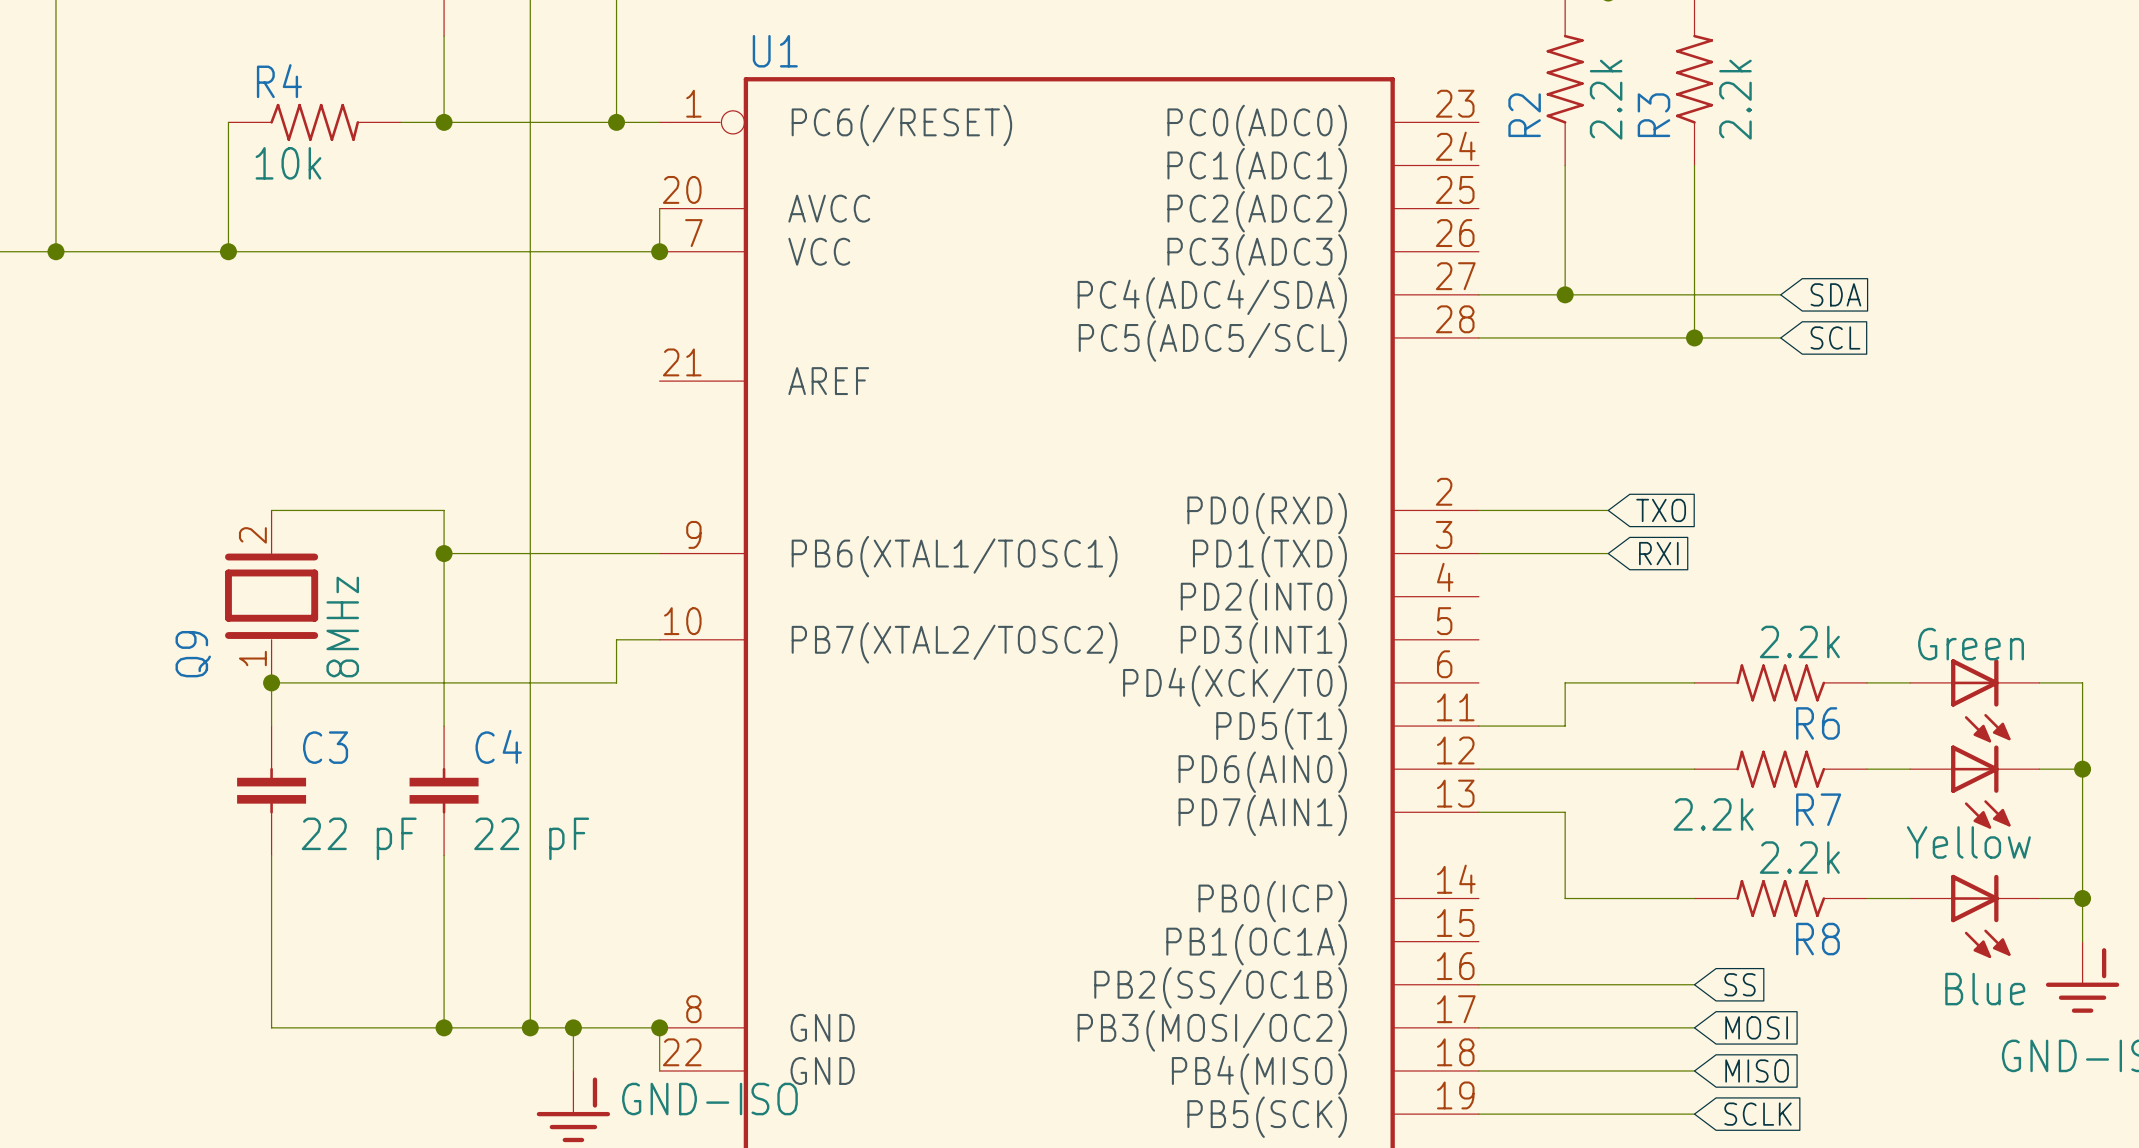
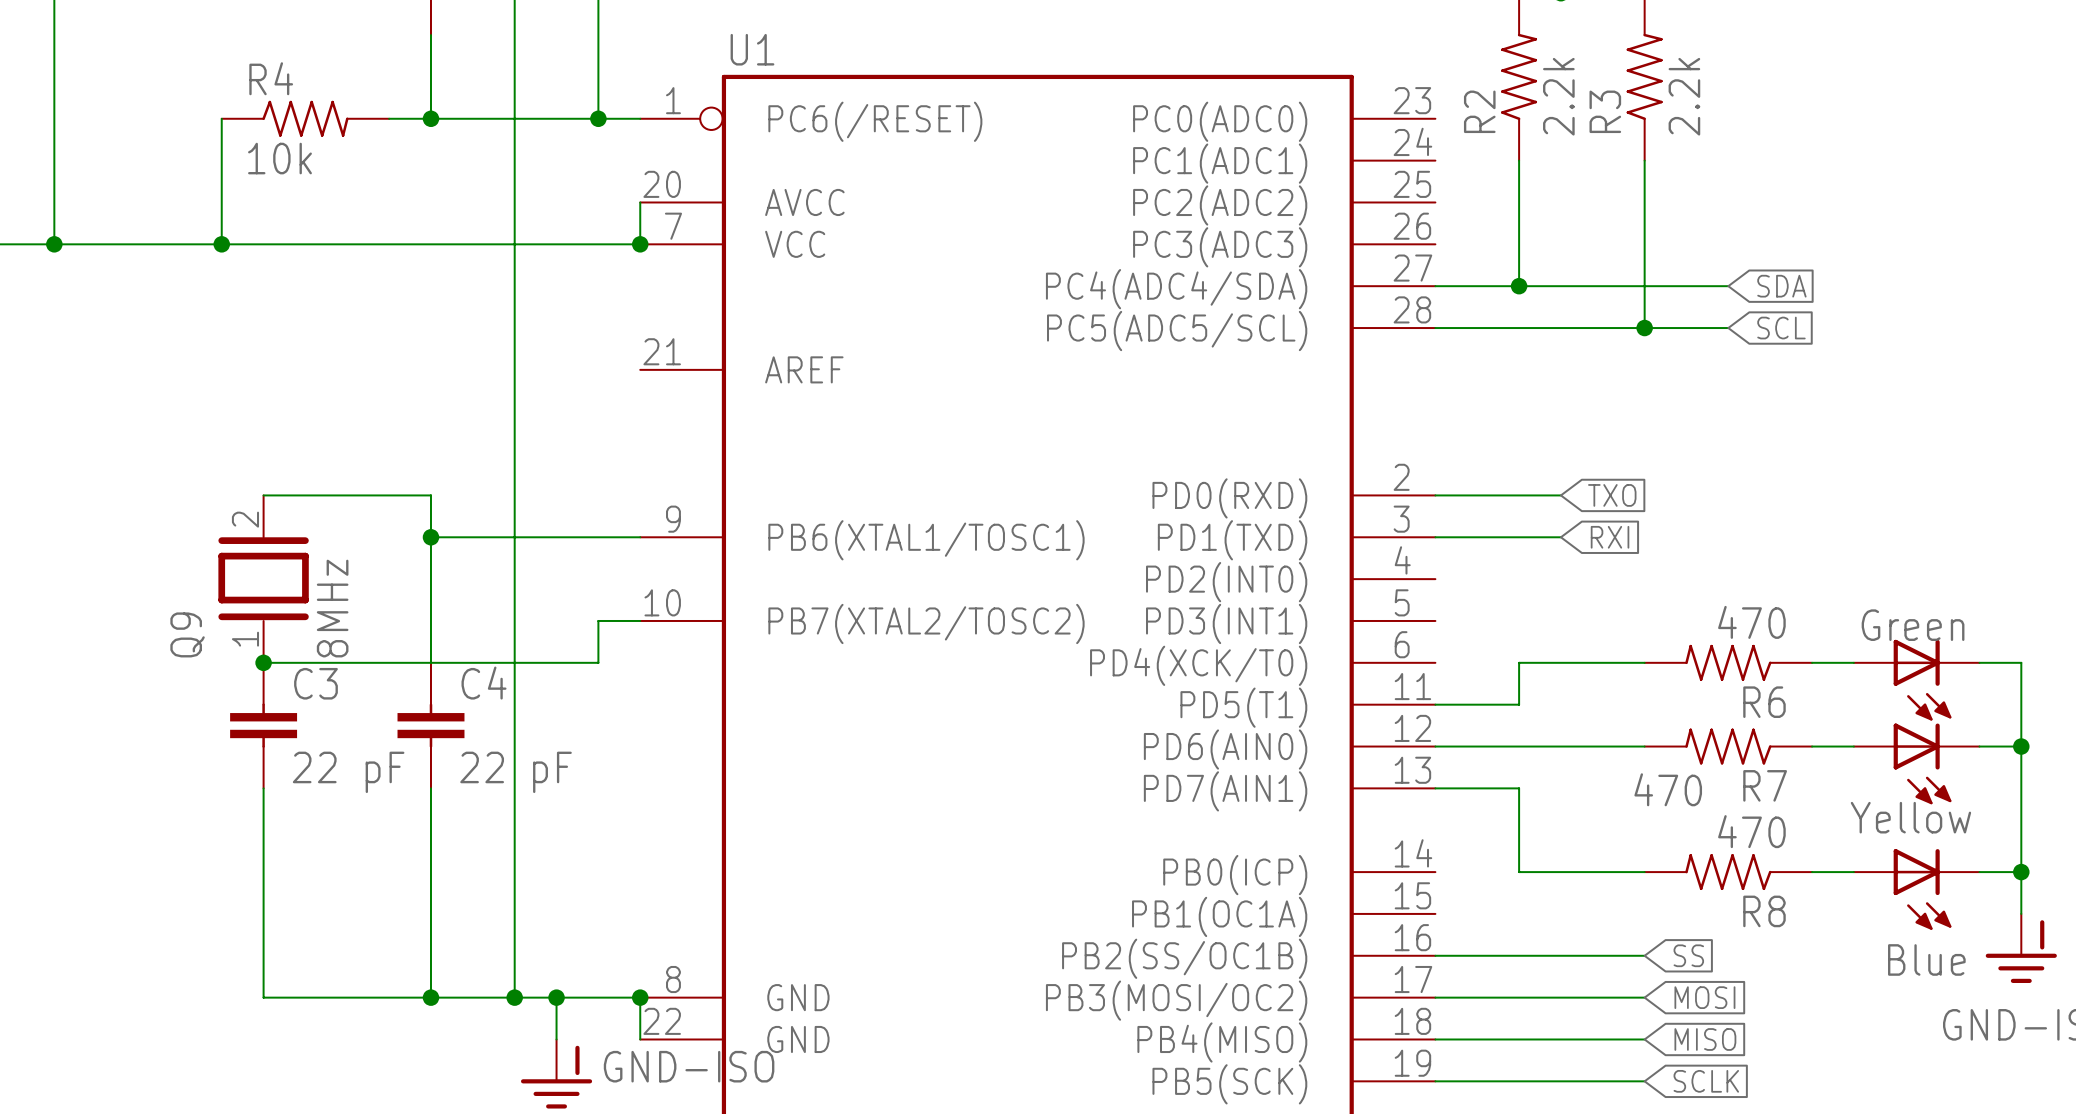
R6 value: 2.2k (1799, 641) -> 470 (1751, 622)
C3 position: (271, 790) -> (263, 725)
C4 position: (444, 790) -> (430, 725)
R7 value: 2.2k (1713, 814) -> 470 (1668, 789)
R8 value: 2.2k (1799, 857) -> 470 (1751, 831)

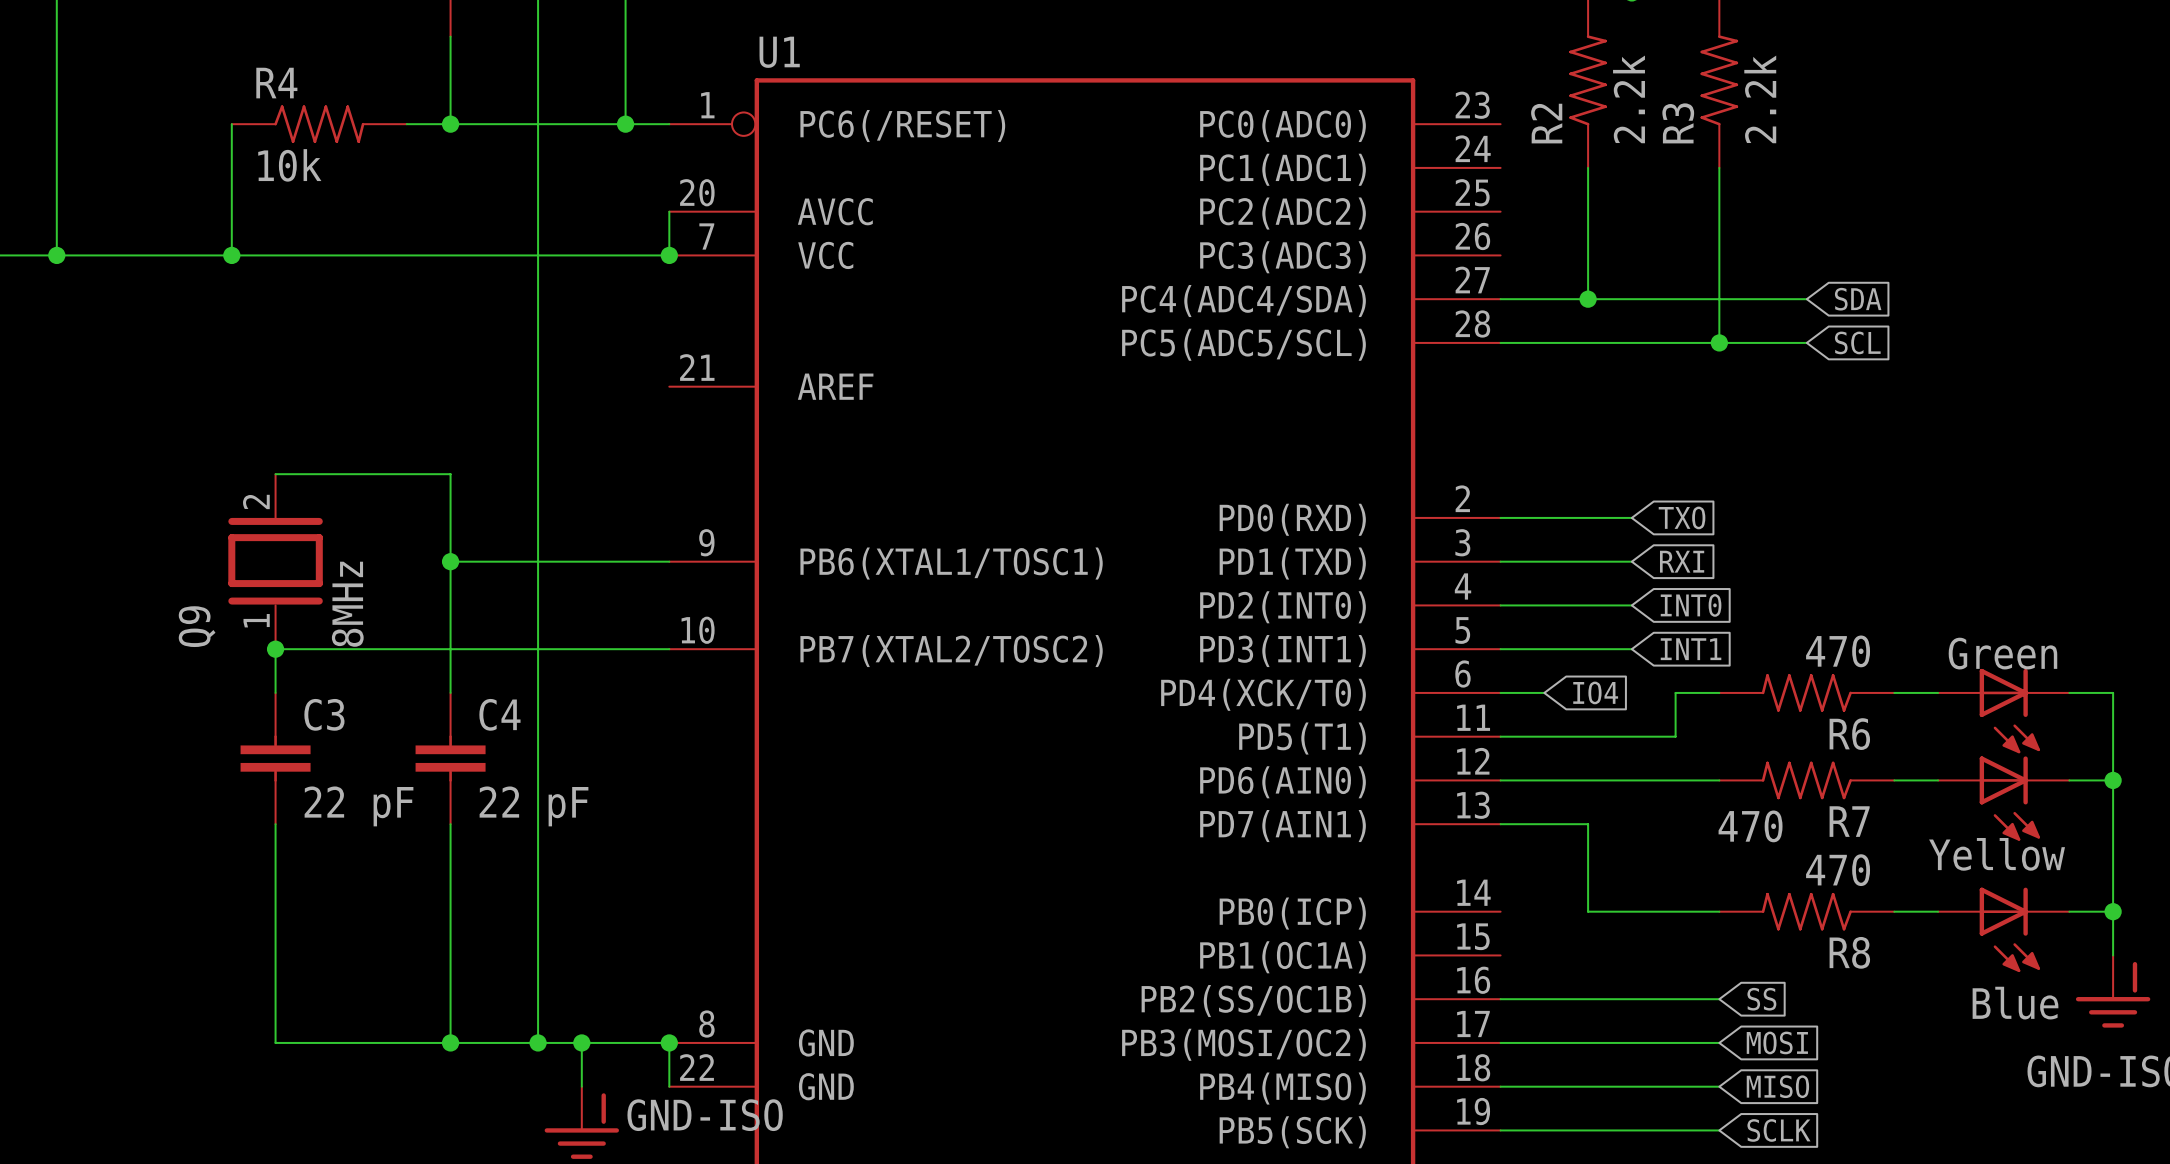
wire: (263, 495) (430, 495) -> (275, 474) (450, 474) (450, 517)
Q9 position: (263, 579) -> (275, 561)
wire: none -> (1500, 605) (1631, 605)
global label: none -> INT0 (1691, 605)
wire: (598, 620) (598, 662) (263, 662) -> (625, 649) (275, 649) (275, 692)
wire: none -> (1500, 649) (1631, 649)
global label: none -> INT1 (1691, 649)
junction position: (263, 662) -> (275, 649)
wire: none -> (1500, 692) (1544, 692)
global label: none -> IO4 (1595, 692)
wire: (1602, 662) (1519, 662) (1519, 704) -> (1675, 692) (1675, 736) (1588, 736)

